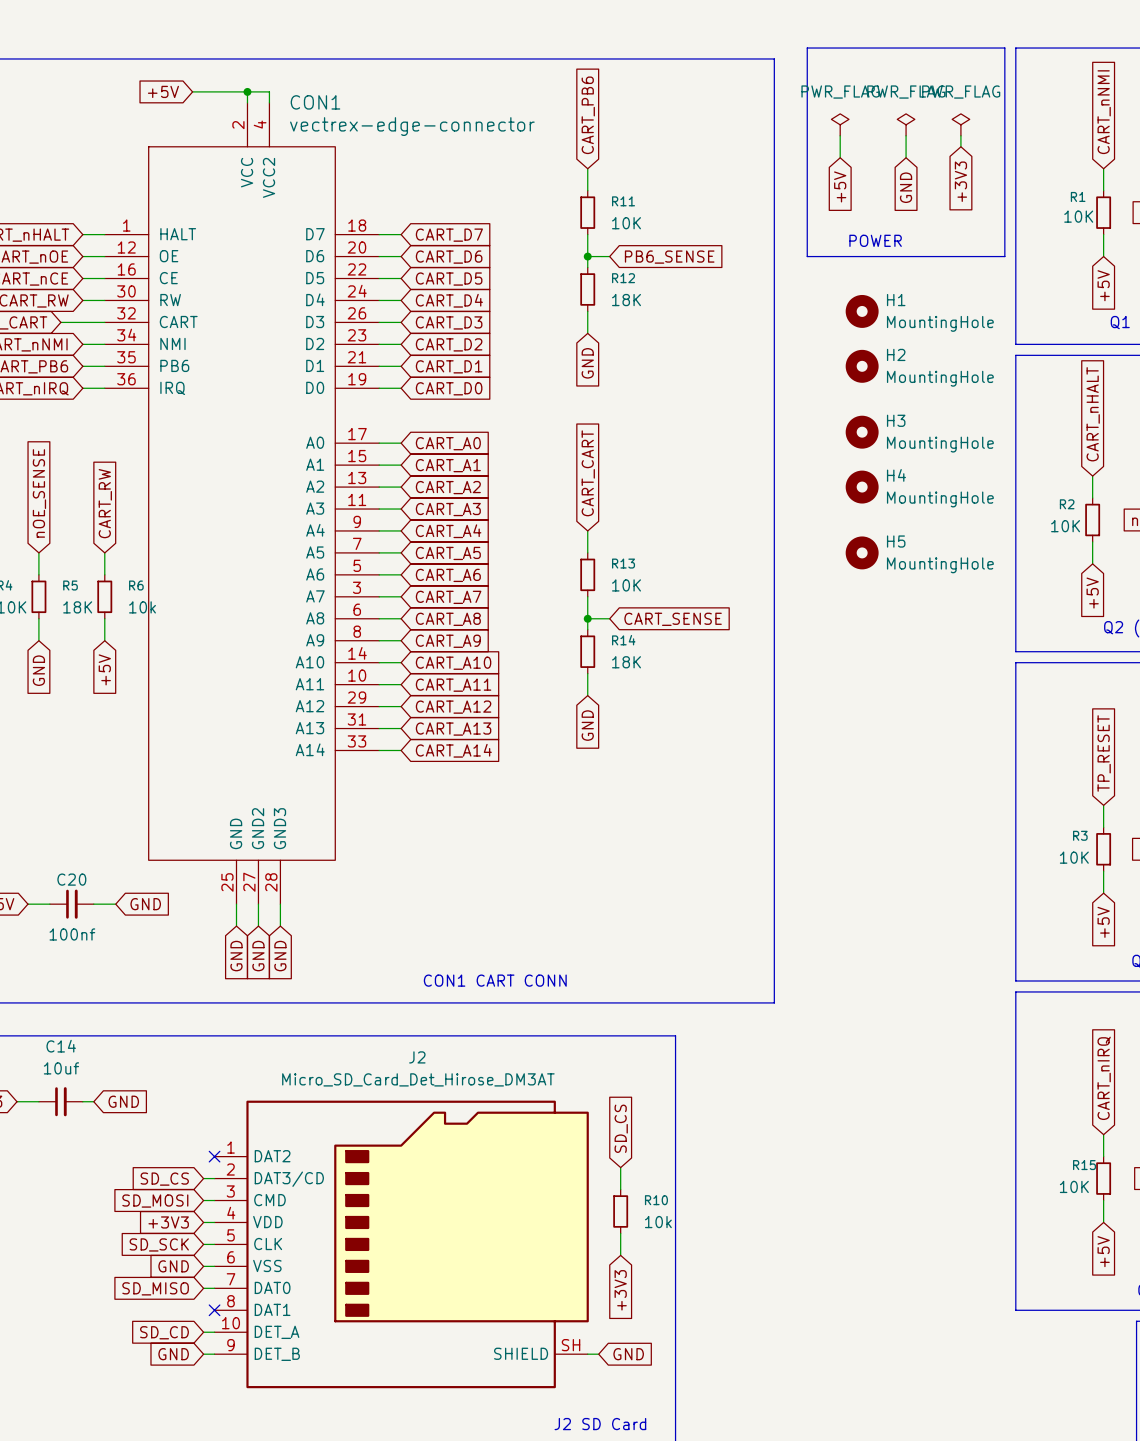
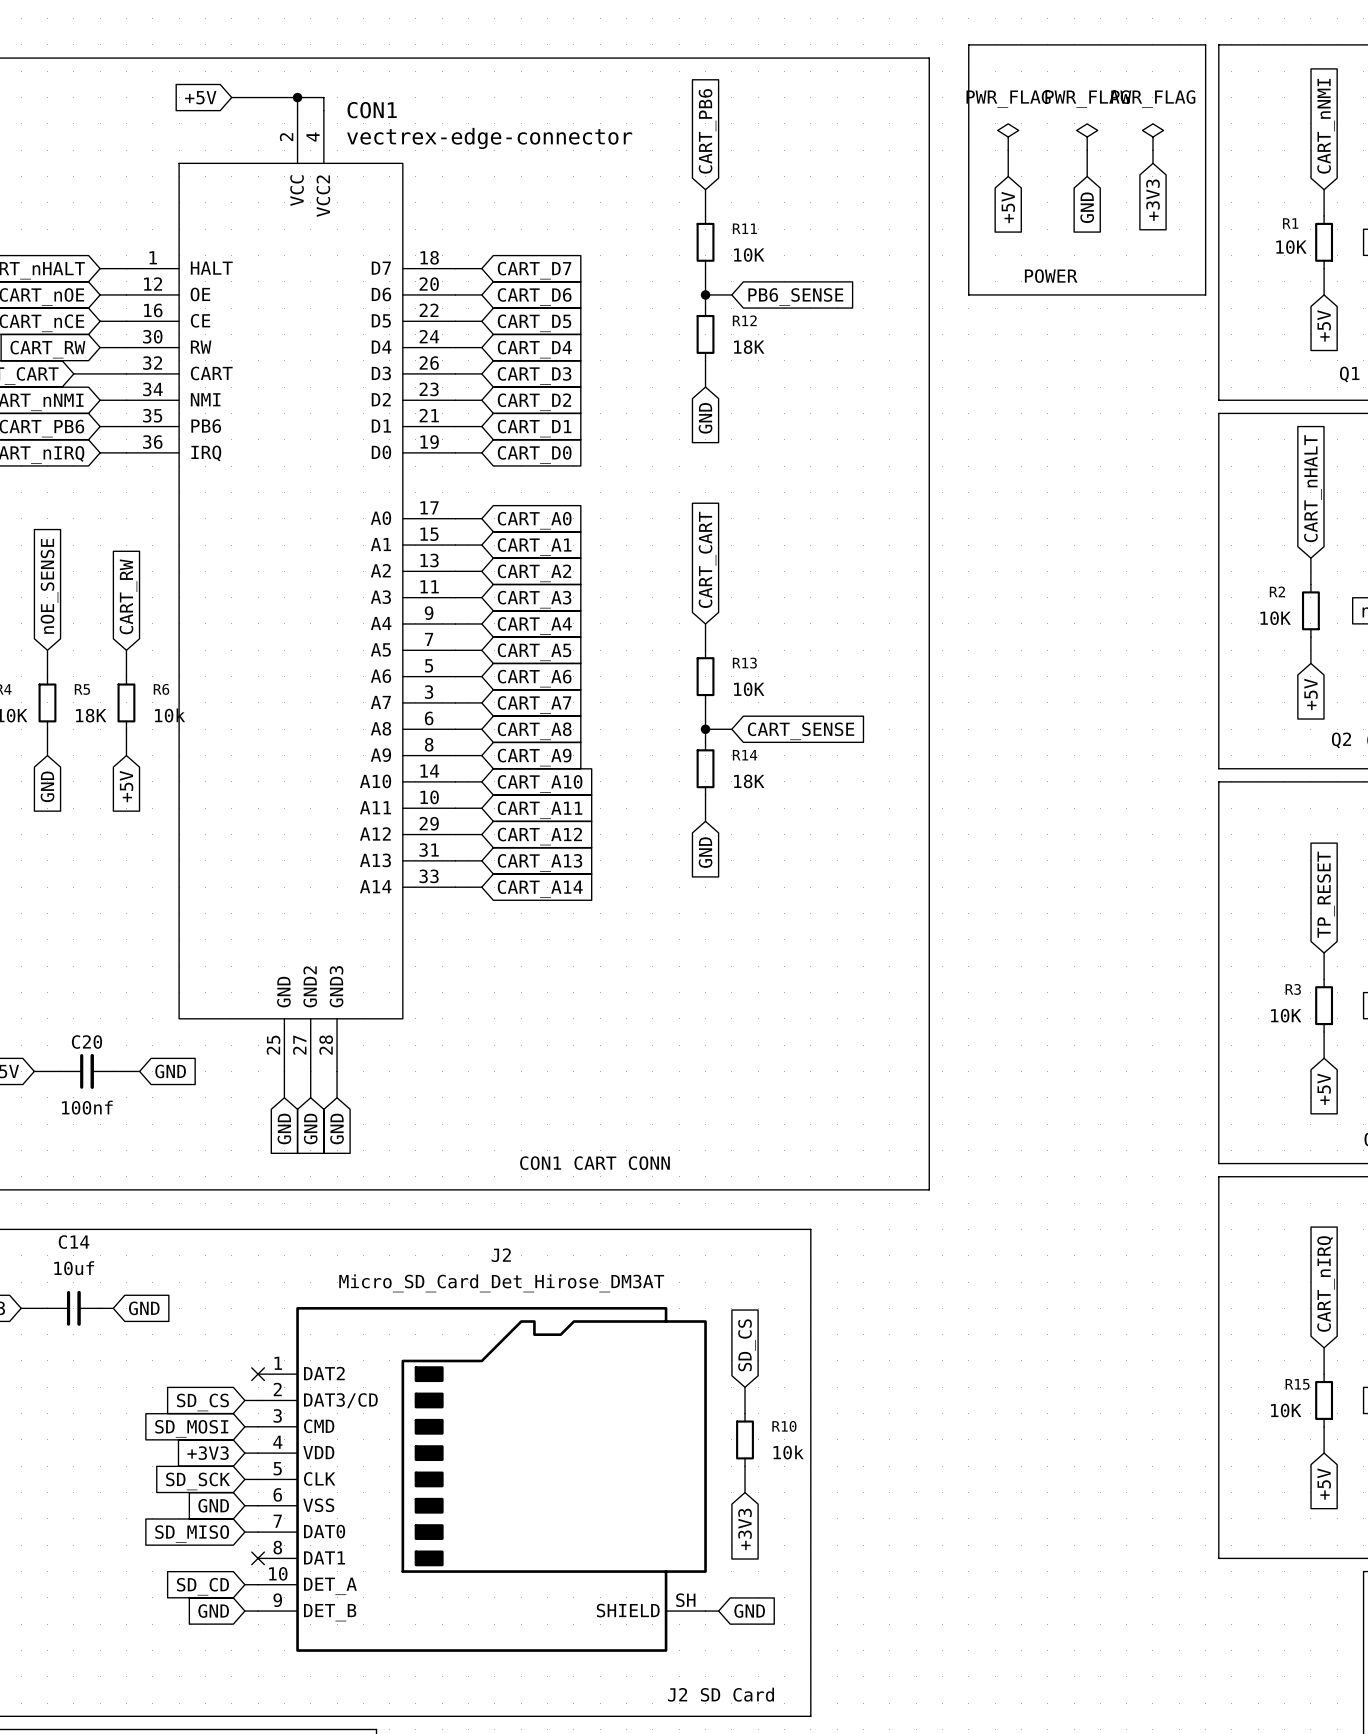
H1: MountingHole (862, 311) -> none
H2: MountingHole (862, 366) -> none
H3: MountingHole (862, 432) -> none
H4: MountingHole (862, 487) -> none
H5: MountingHole (862, 552) -> none

